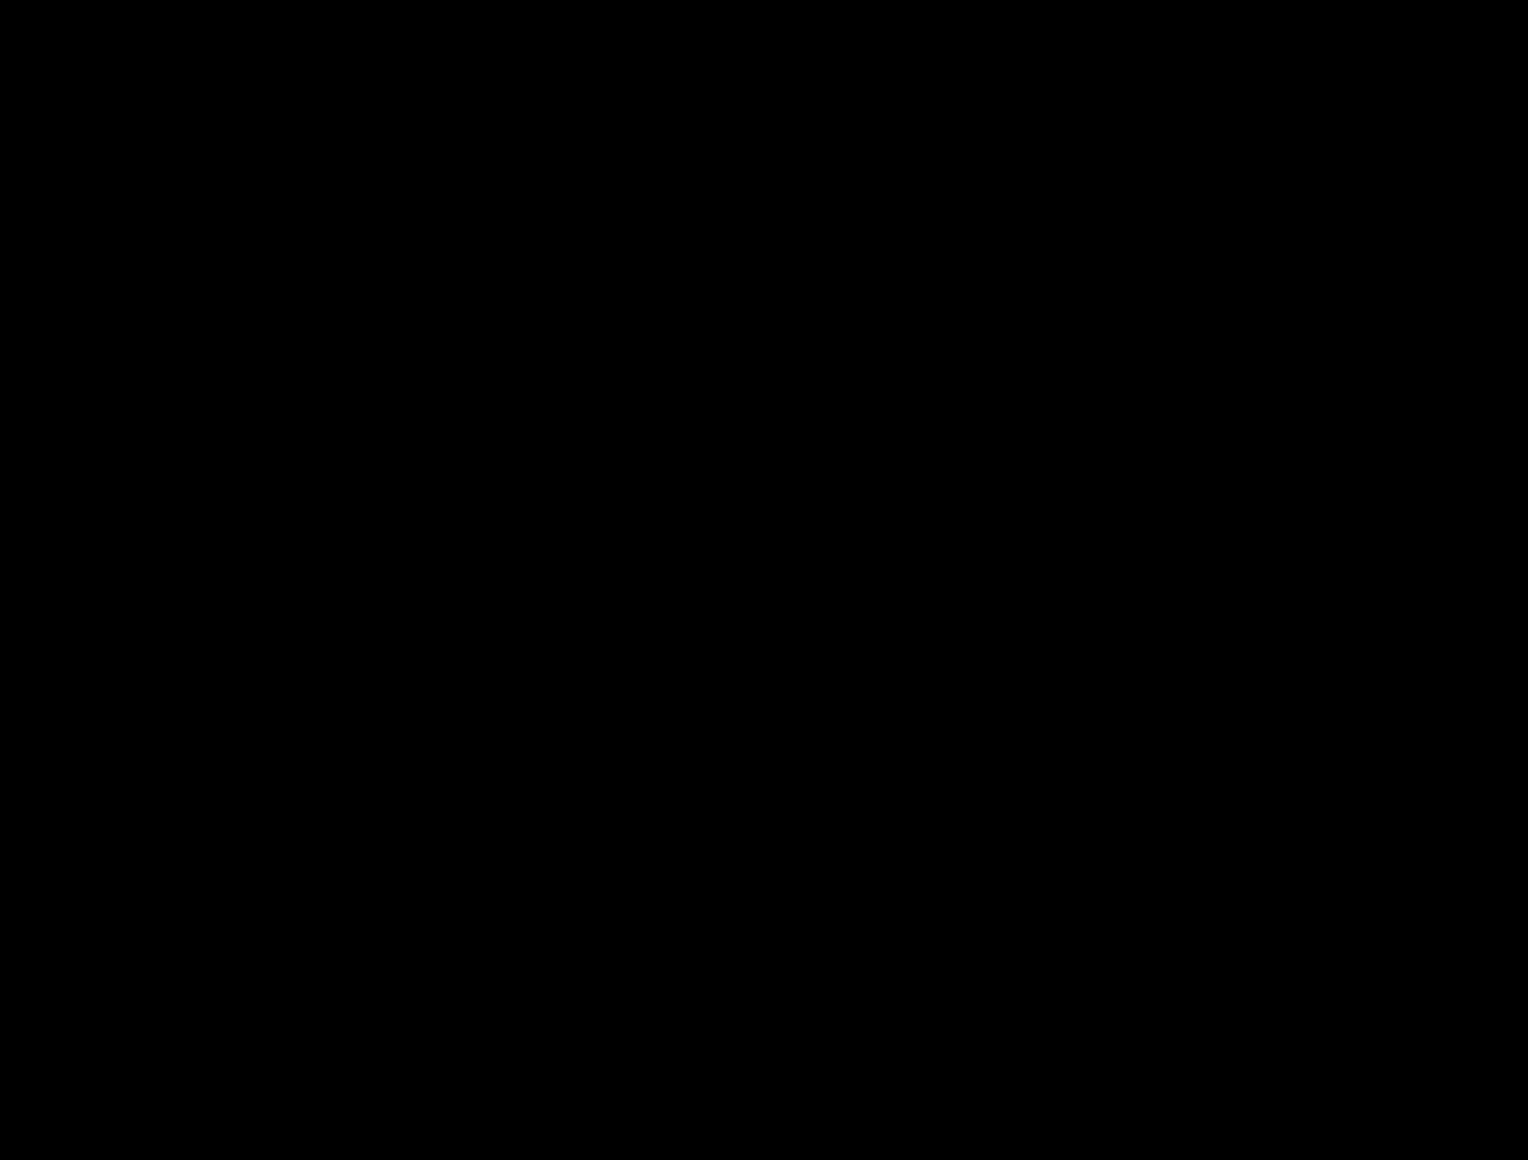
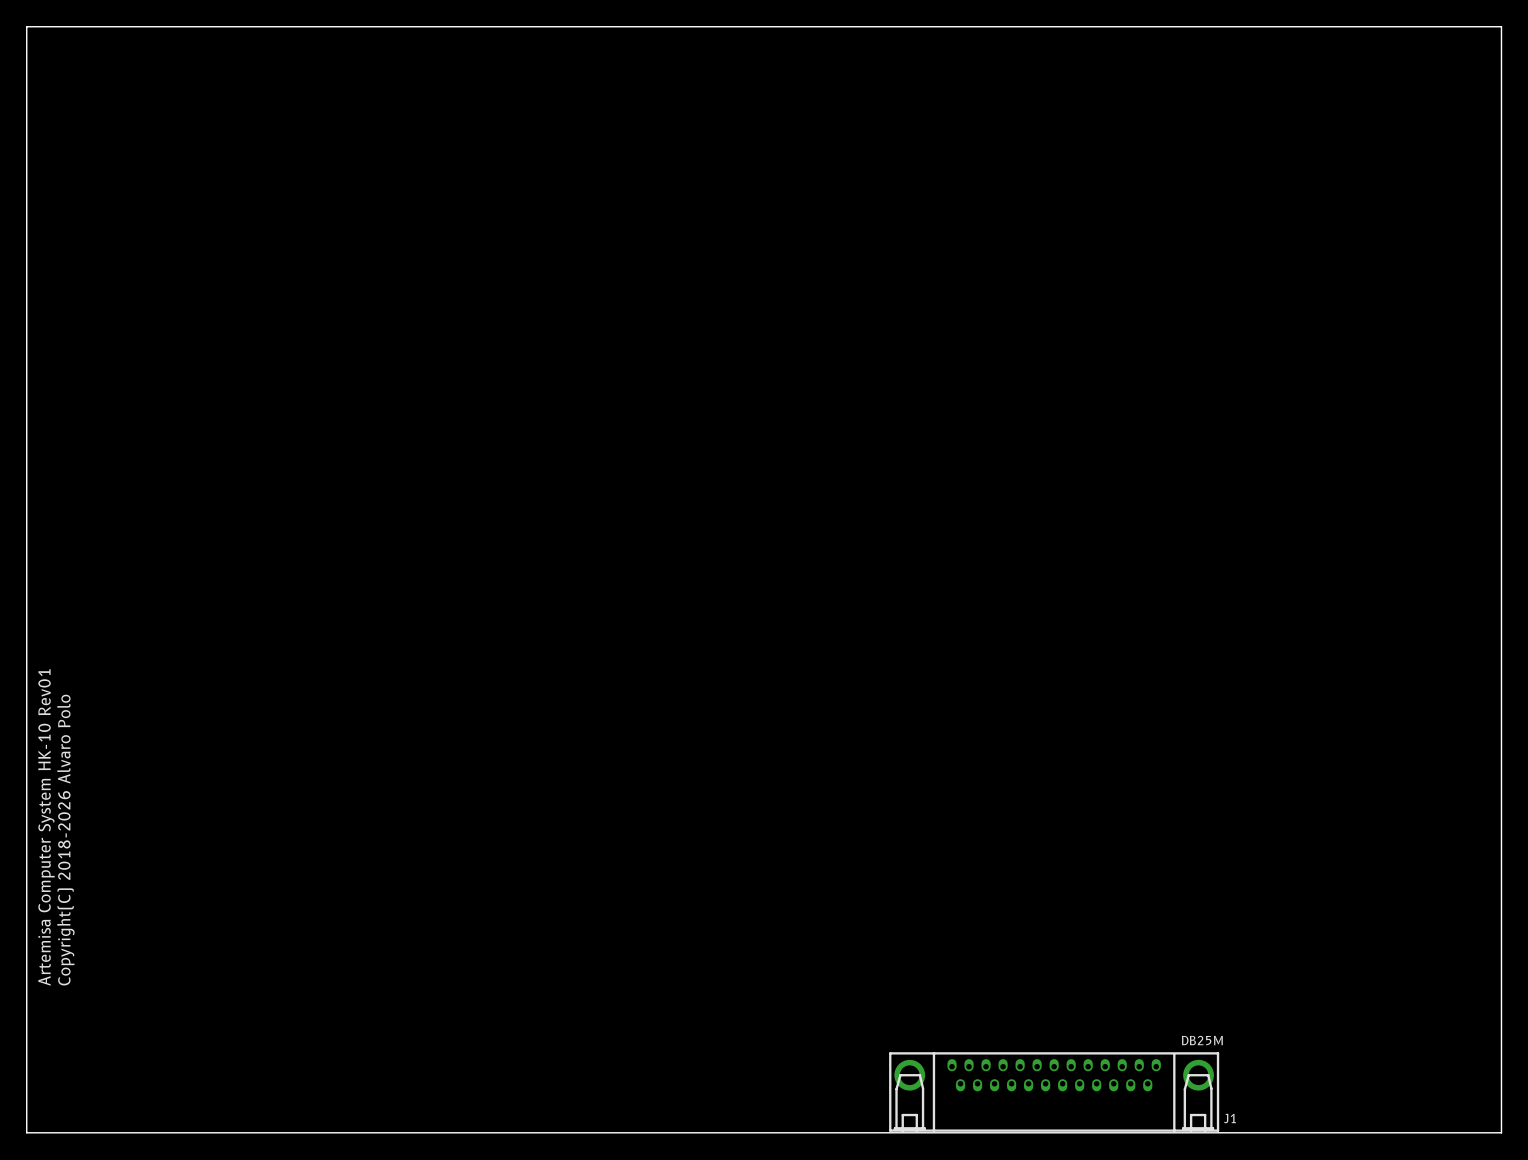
board edge: none -> (26, 26) (1501, 26) (1501, 1132) (26, 1132) (26, 26)
text: none -> Artemisa Computer System HK-10 Rev01 (46, 827)
text: none -> Copyright(C) 2018-2026 Alvaro Polo (65, 840)
J1: none -> DB25M (1054, 1092)

